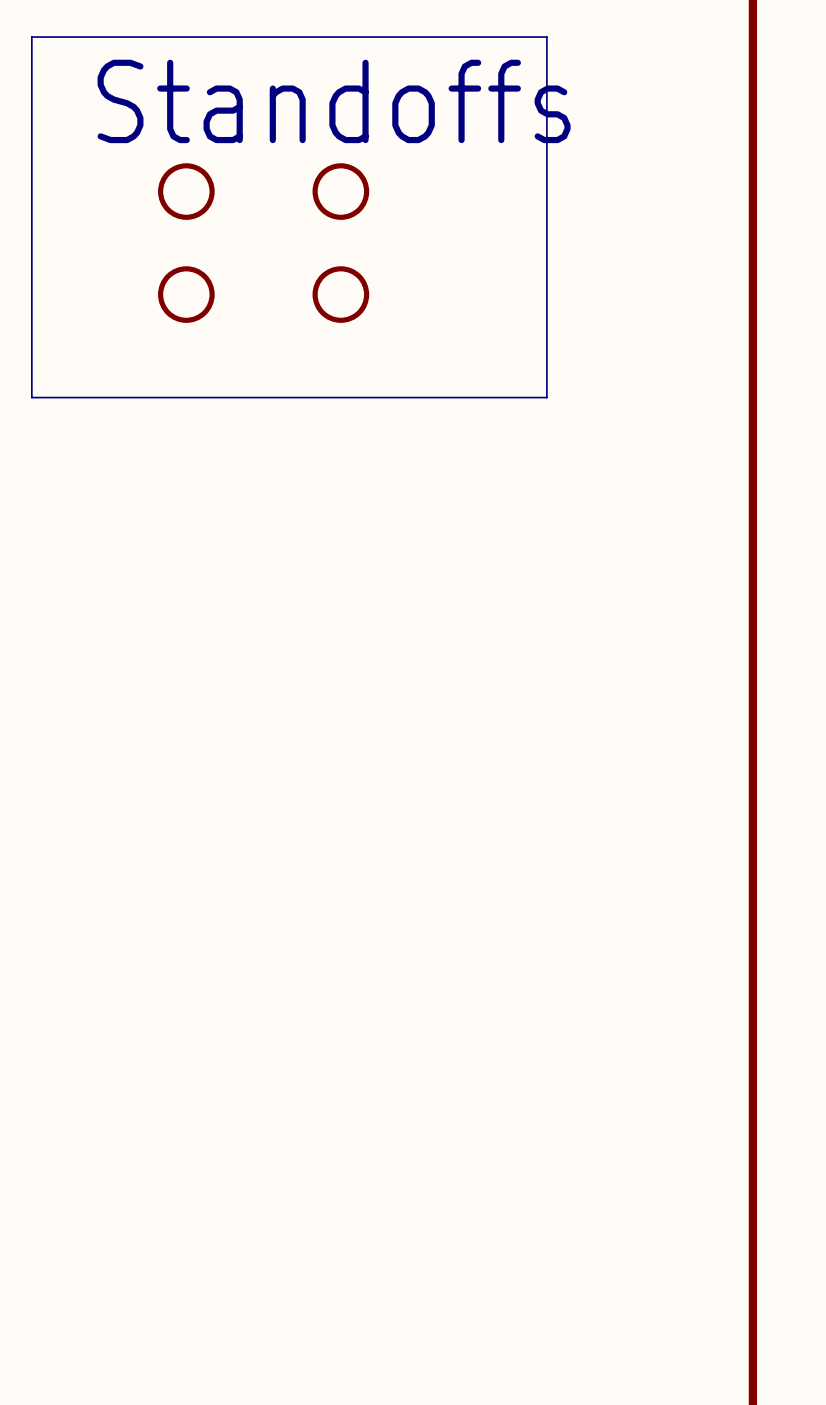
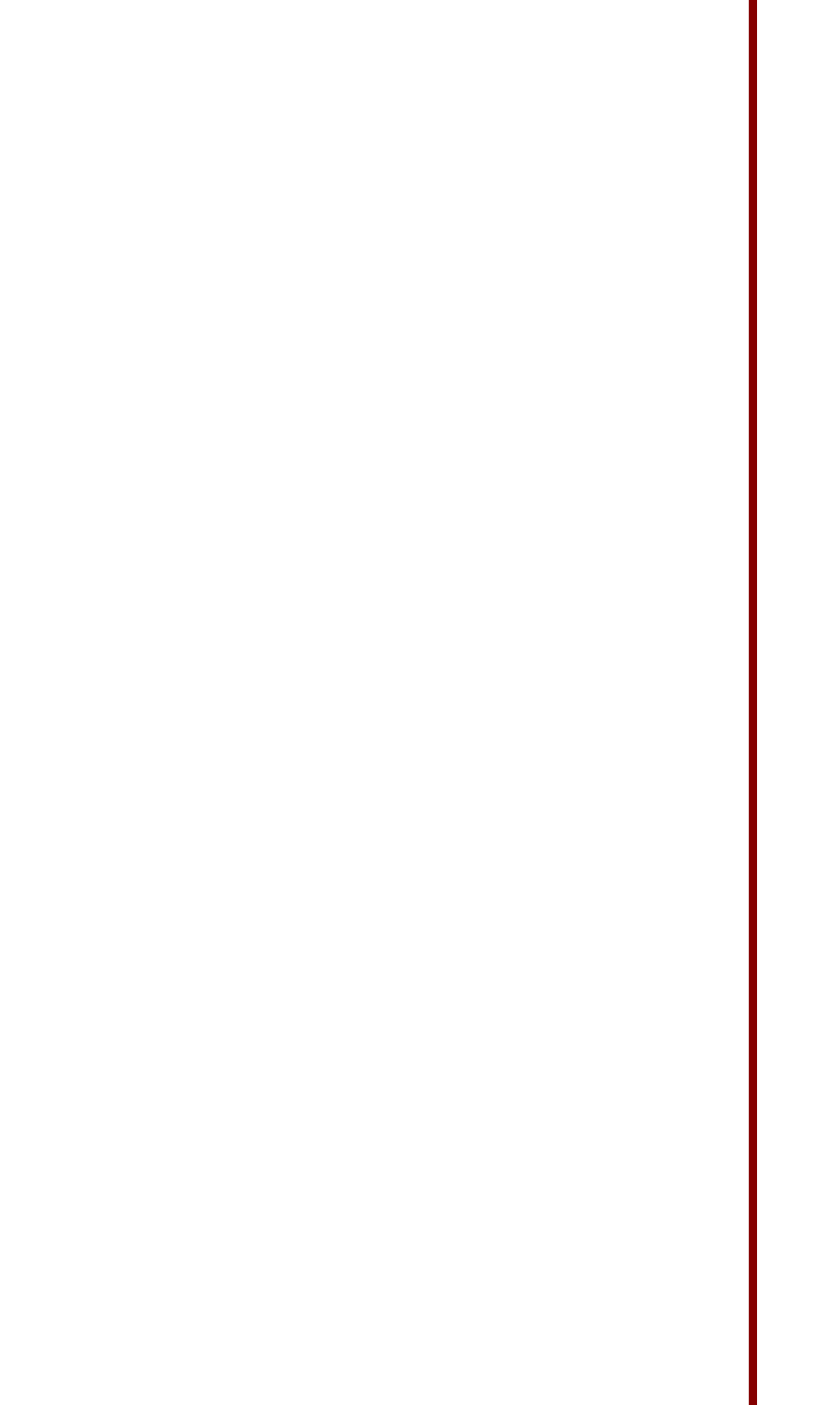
wire: (31, 37) (31, 397) (546, 397) (546, 37) (31, 37) -> none
text: Standoffs (334, 101) -> none
part: (186, 191) -> none
part: (340, 191) -> none
part: (186, 294) -> none
part: (340, 294) -> none

